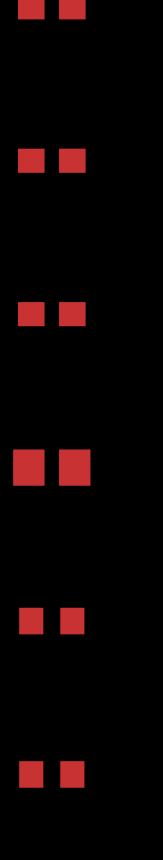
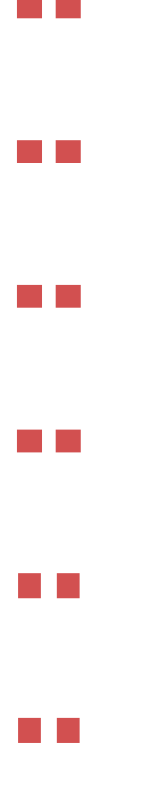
part footprint: [13, 449, 91, 486] -> [16, 429, 81, 453]

